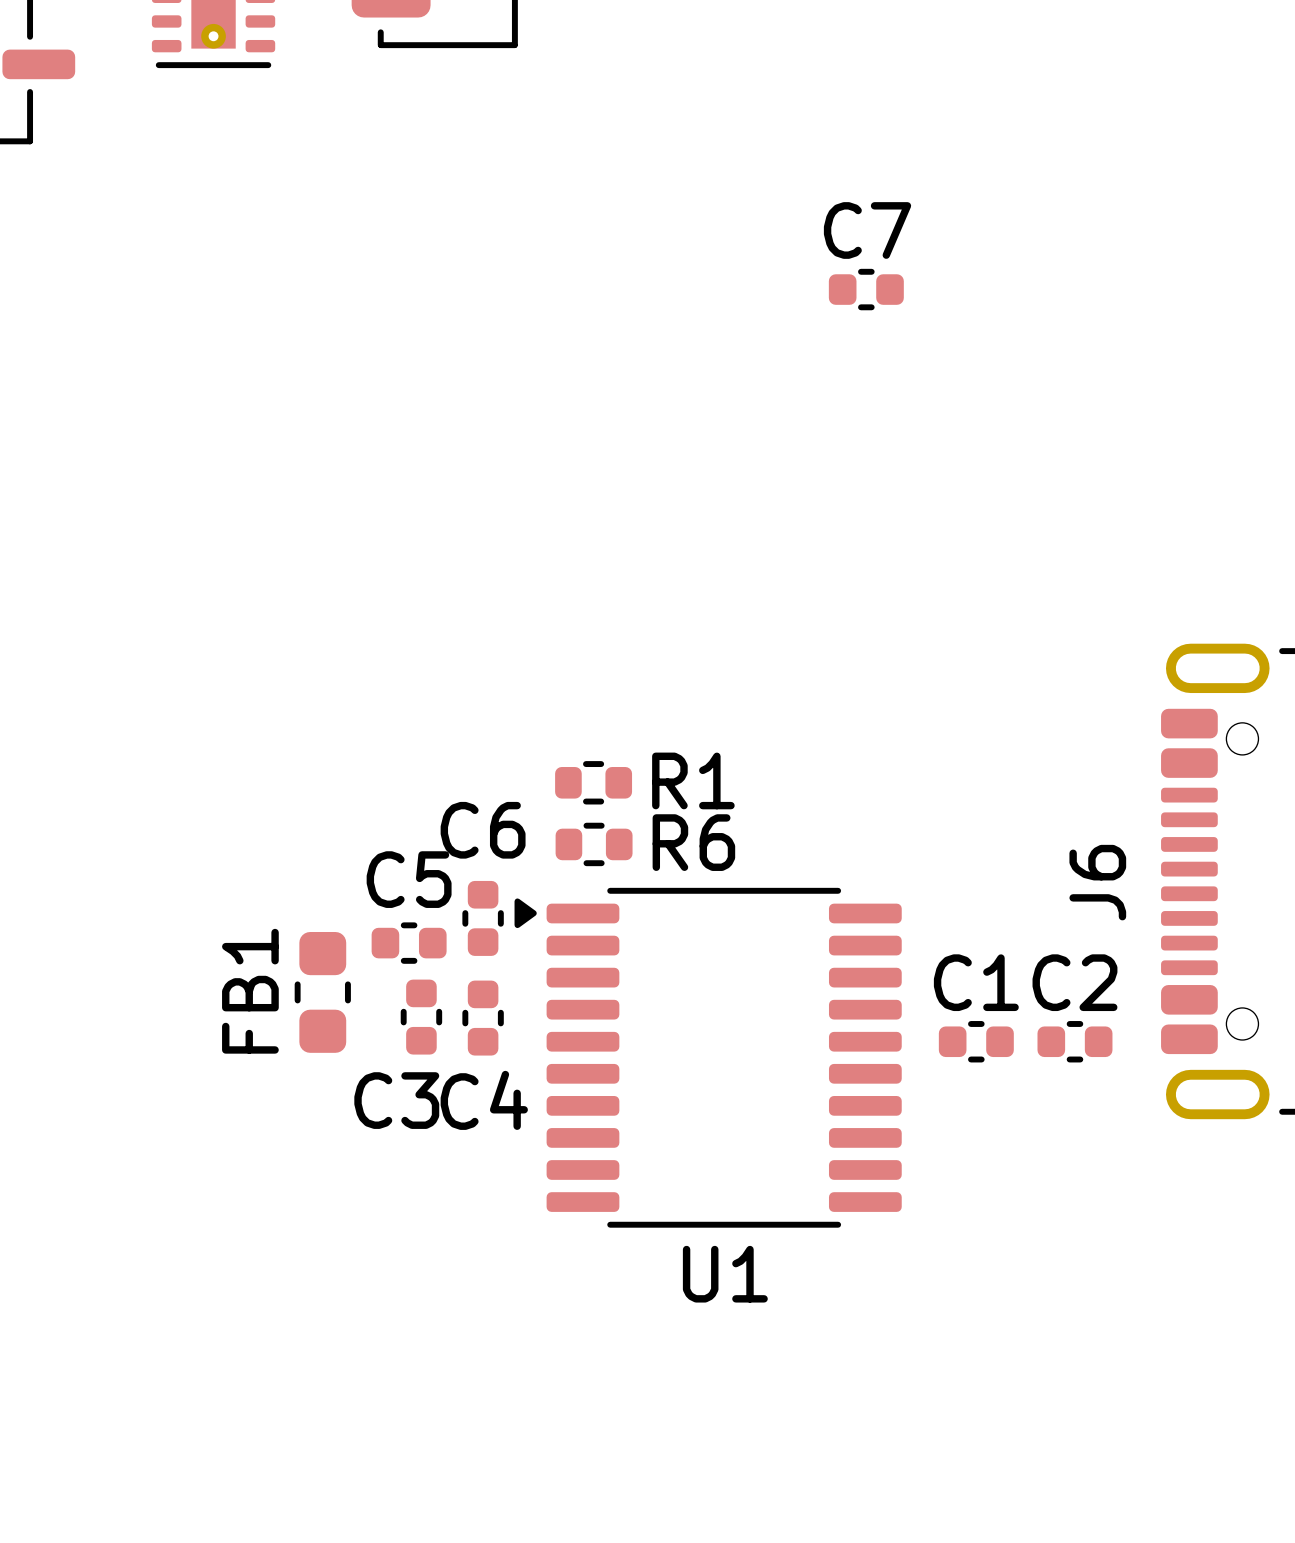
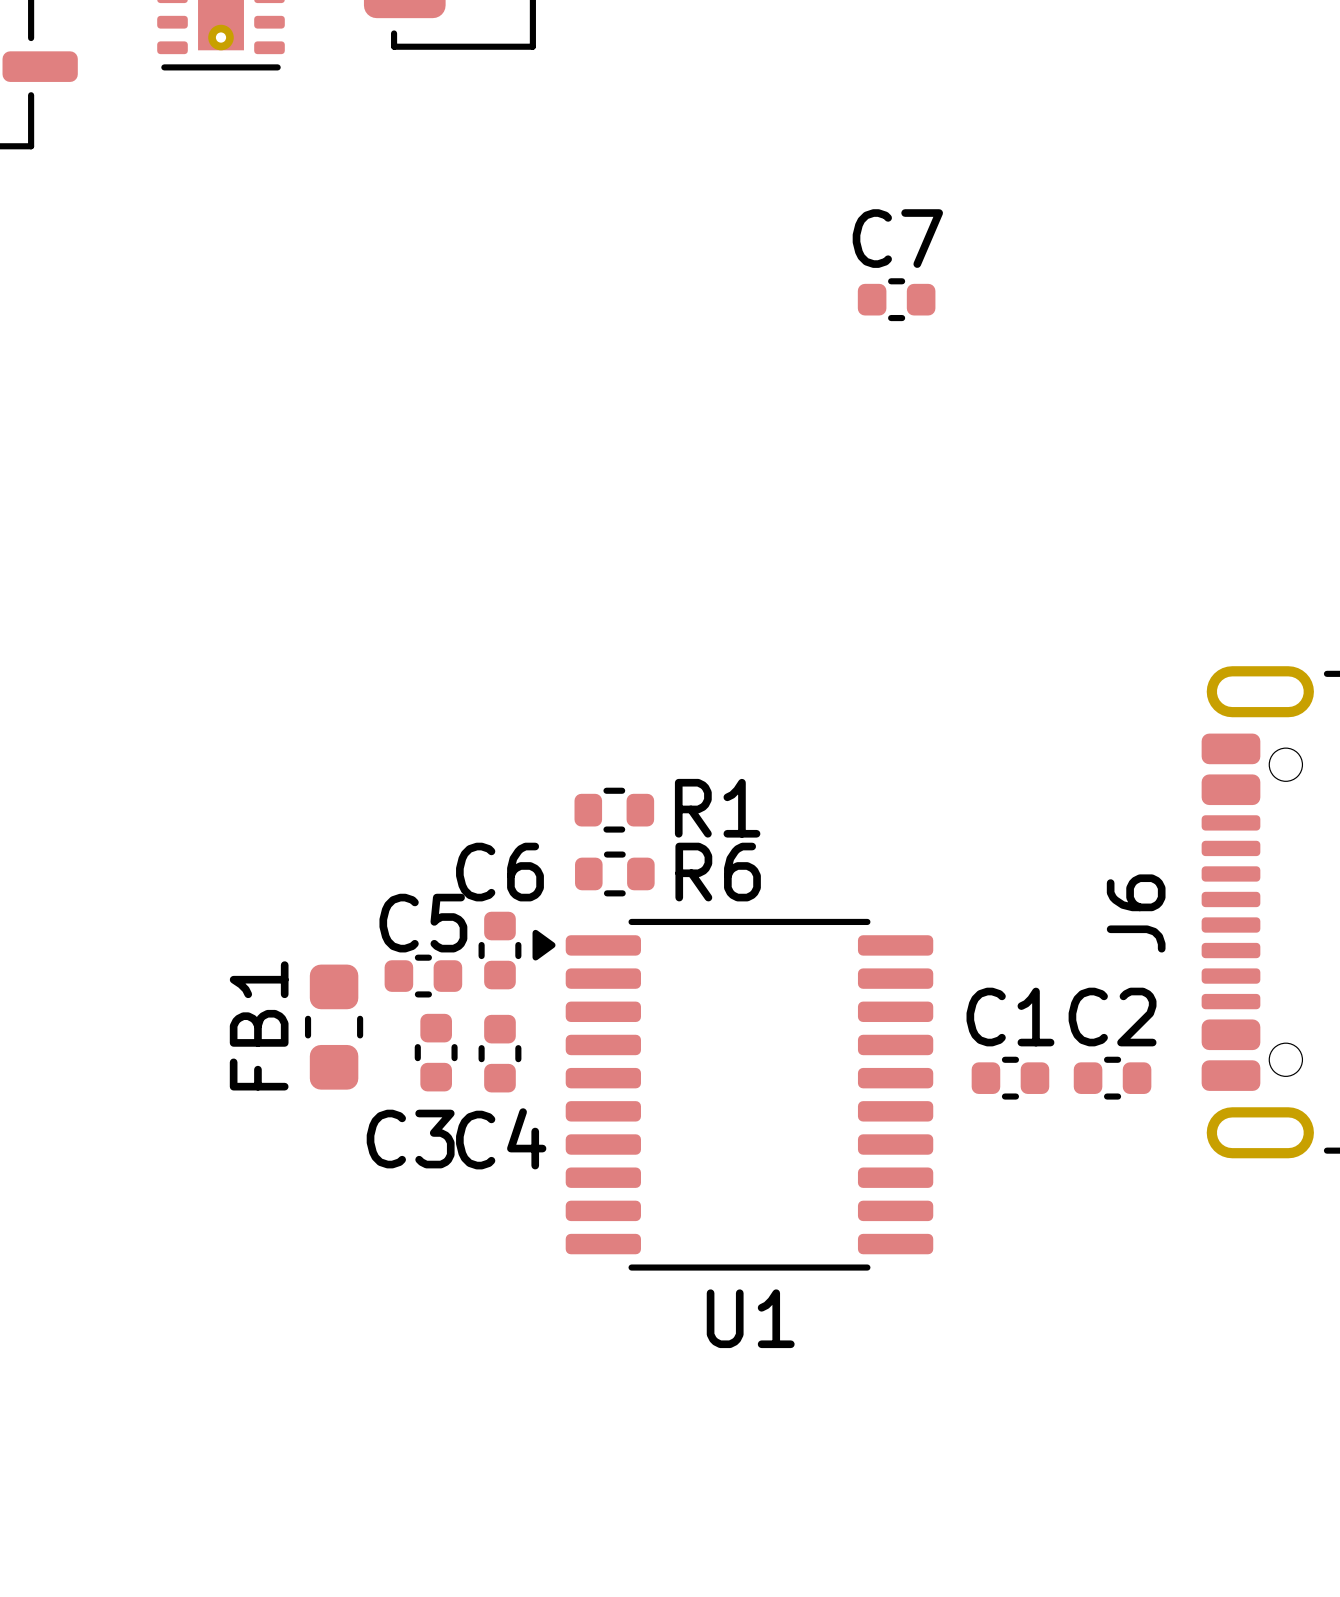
C6 name position: C6 (483, 830) -> C6 (499, 872)
C5 name position: C5 (409, 879) -> C5 (423, 923)

